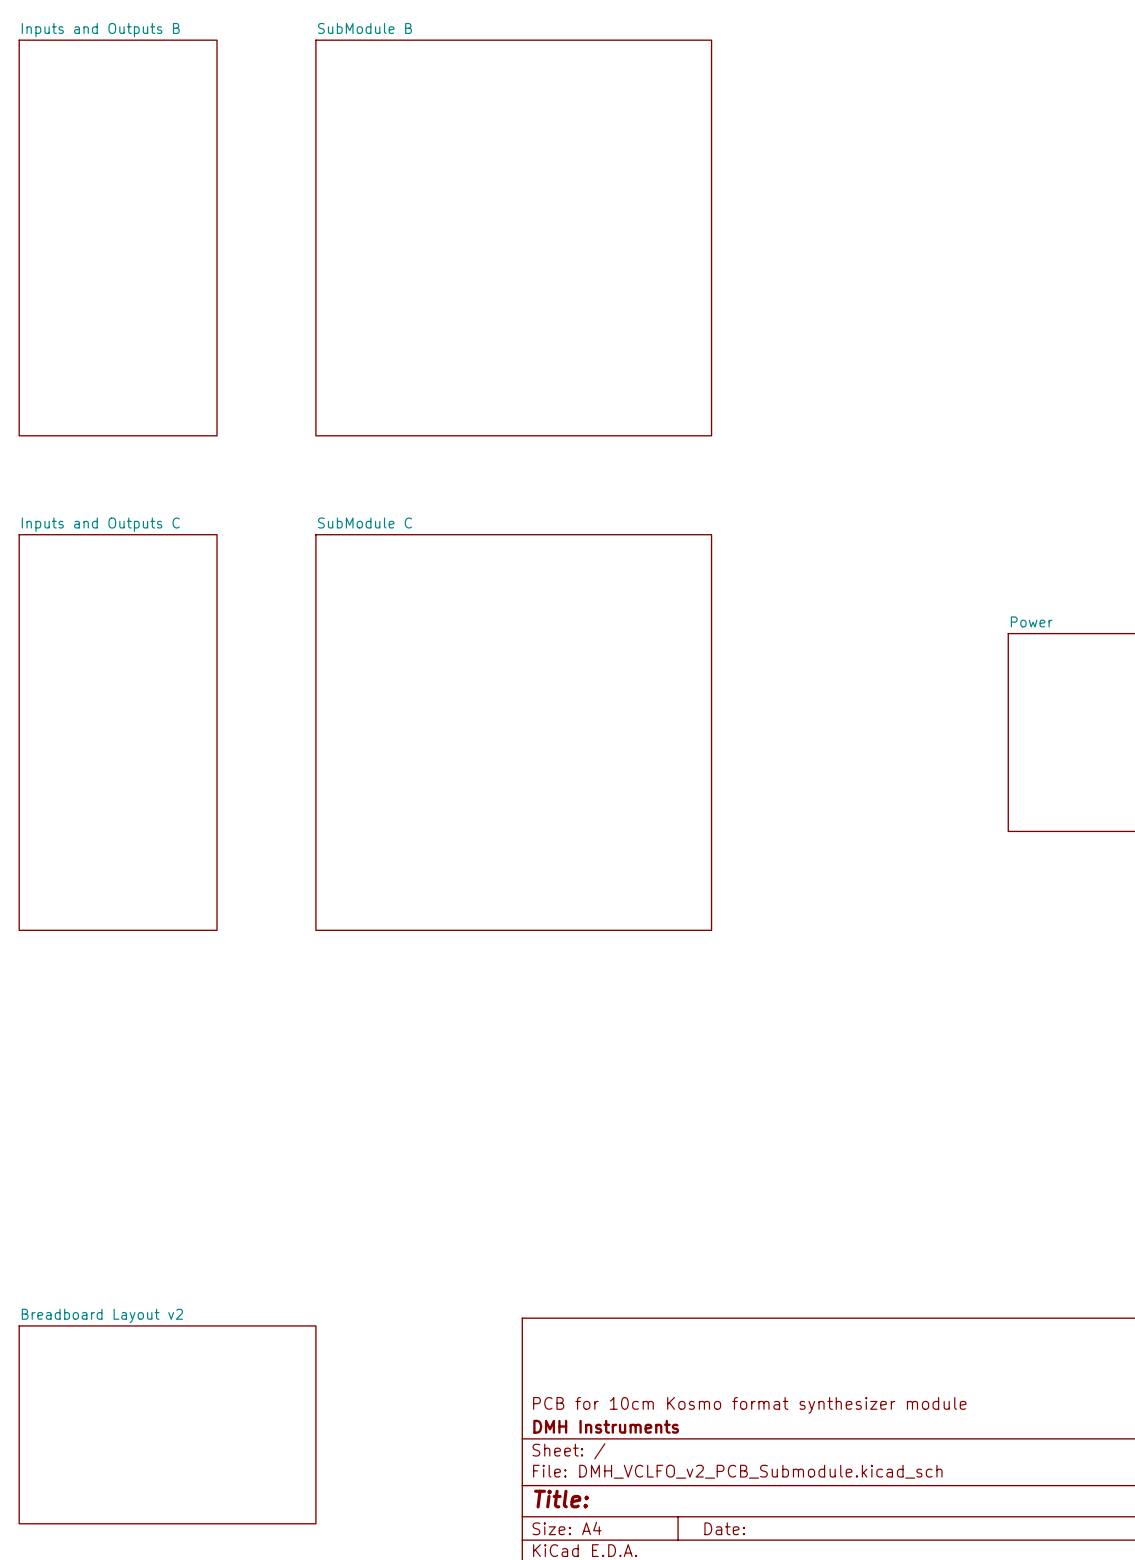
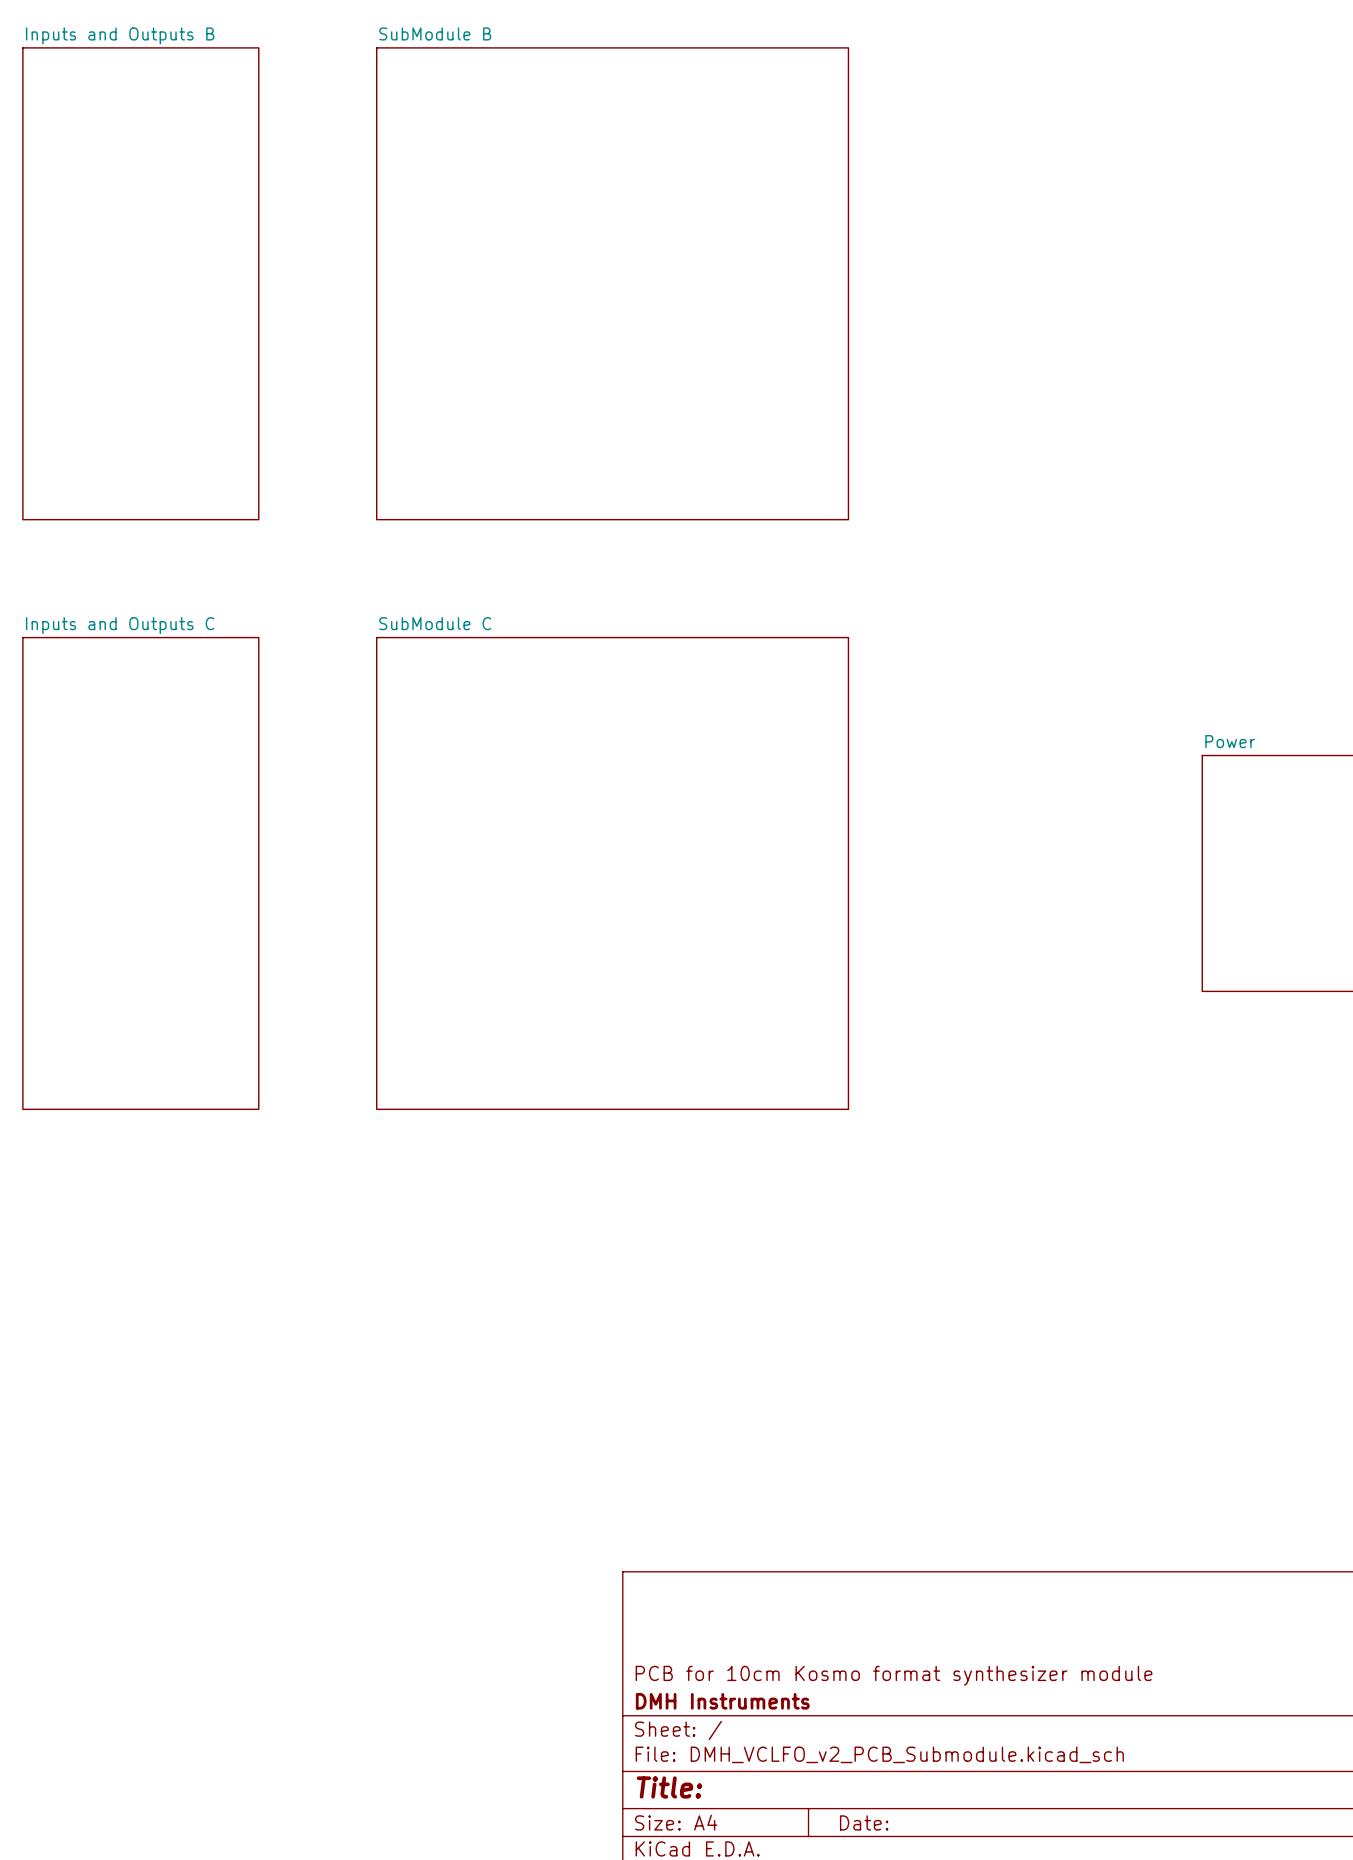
sheet Breadboard Layout v2: (167, 1424) -> none

